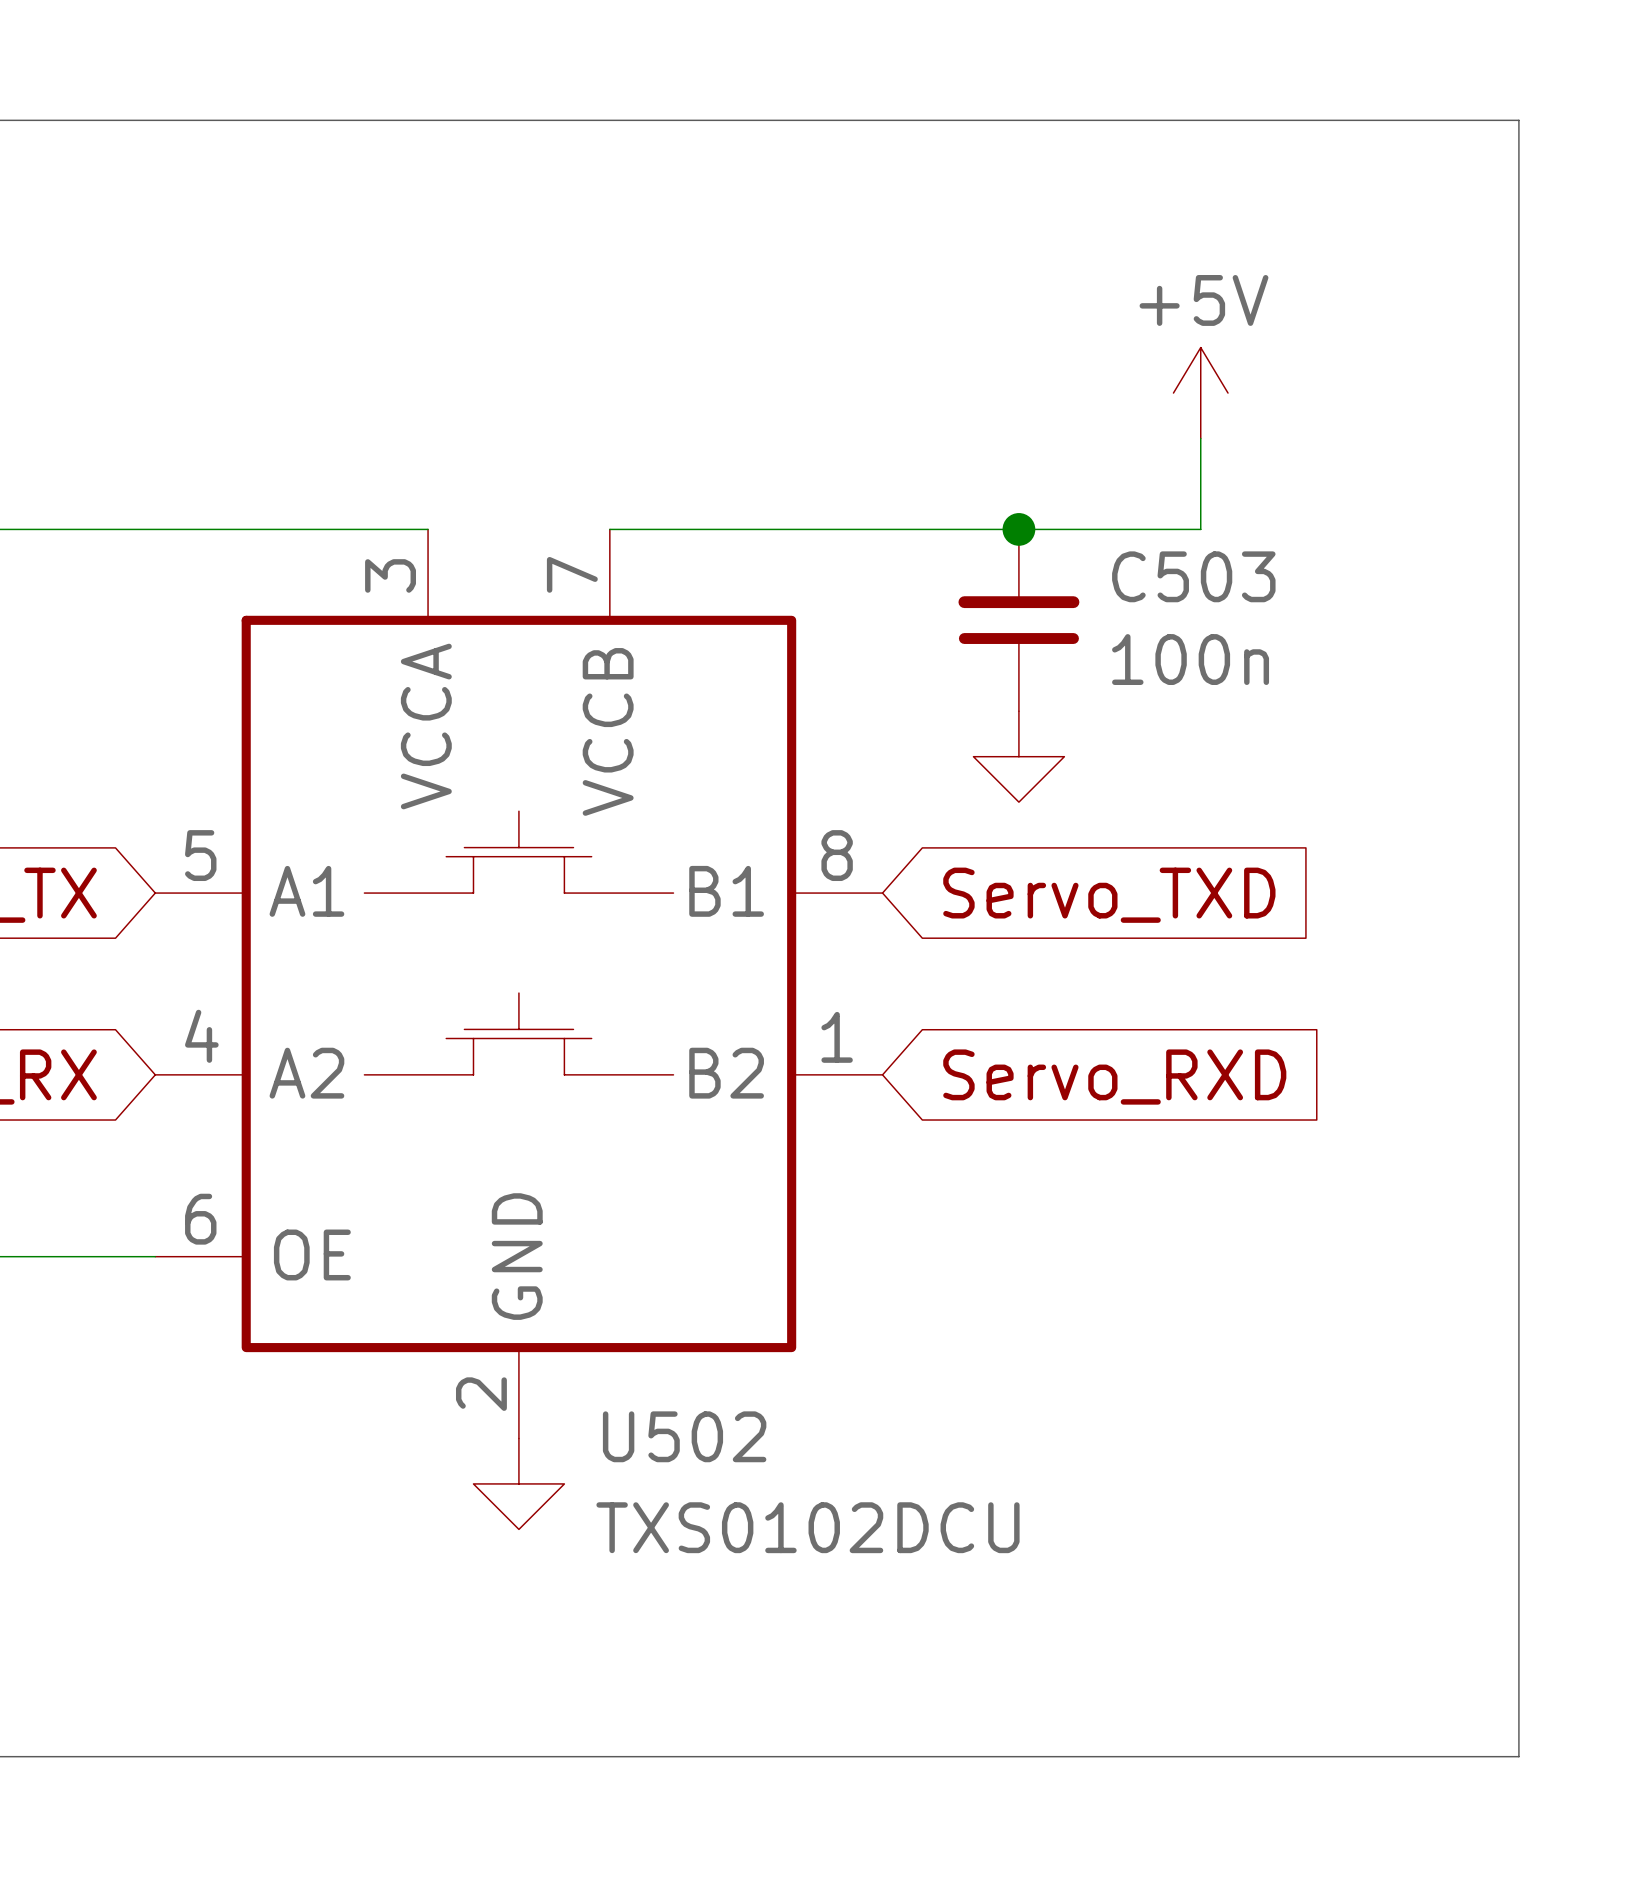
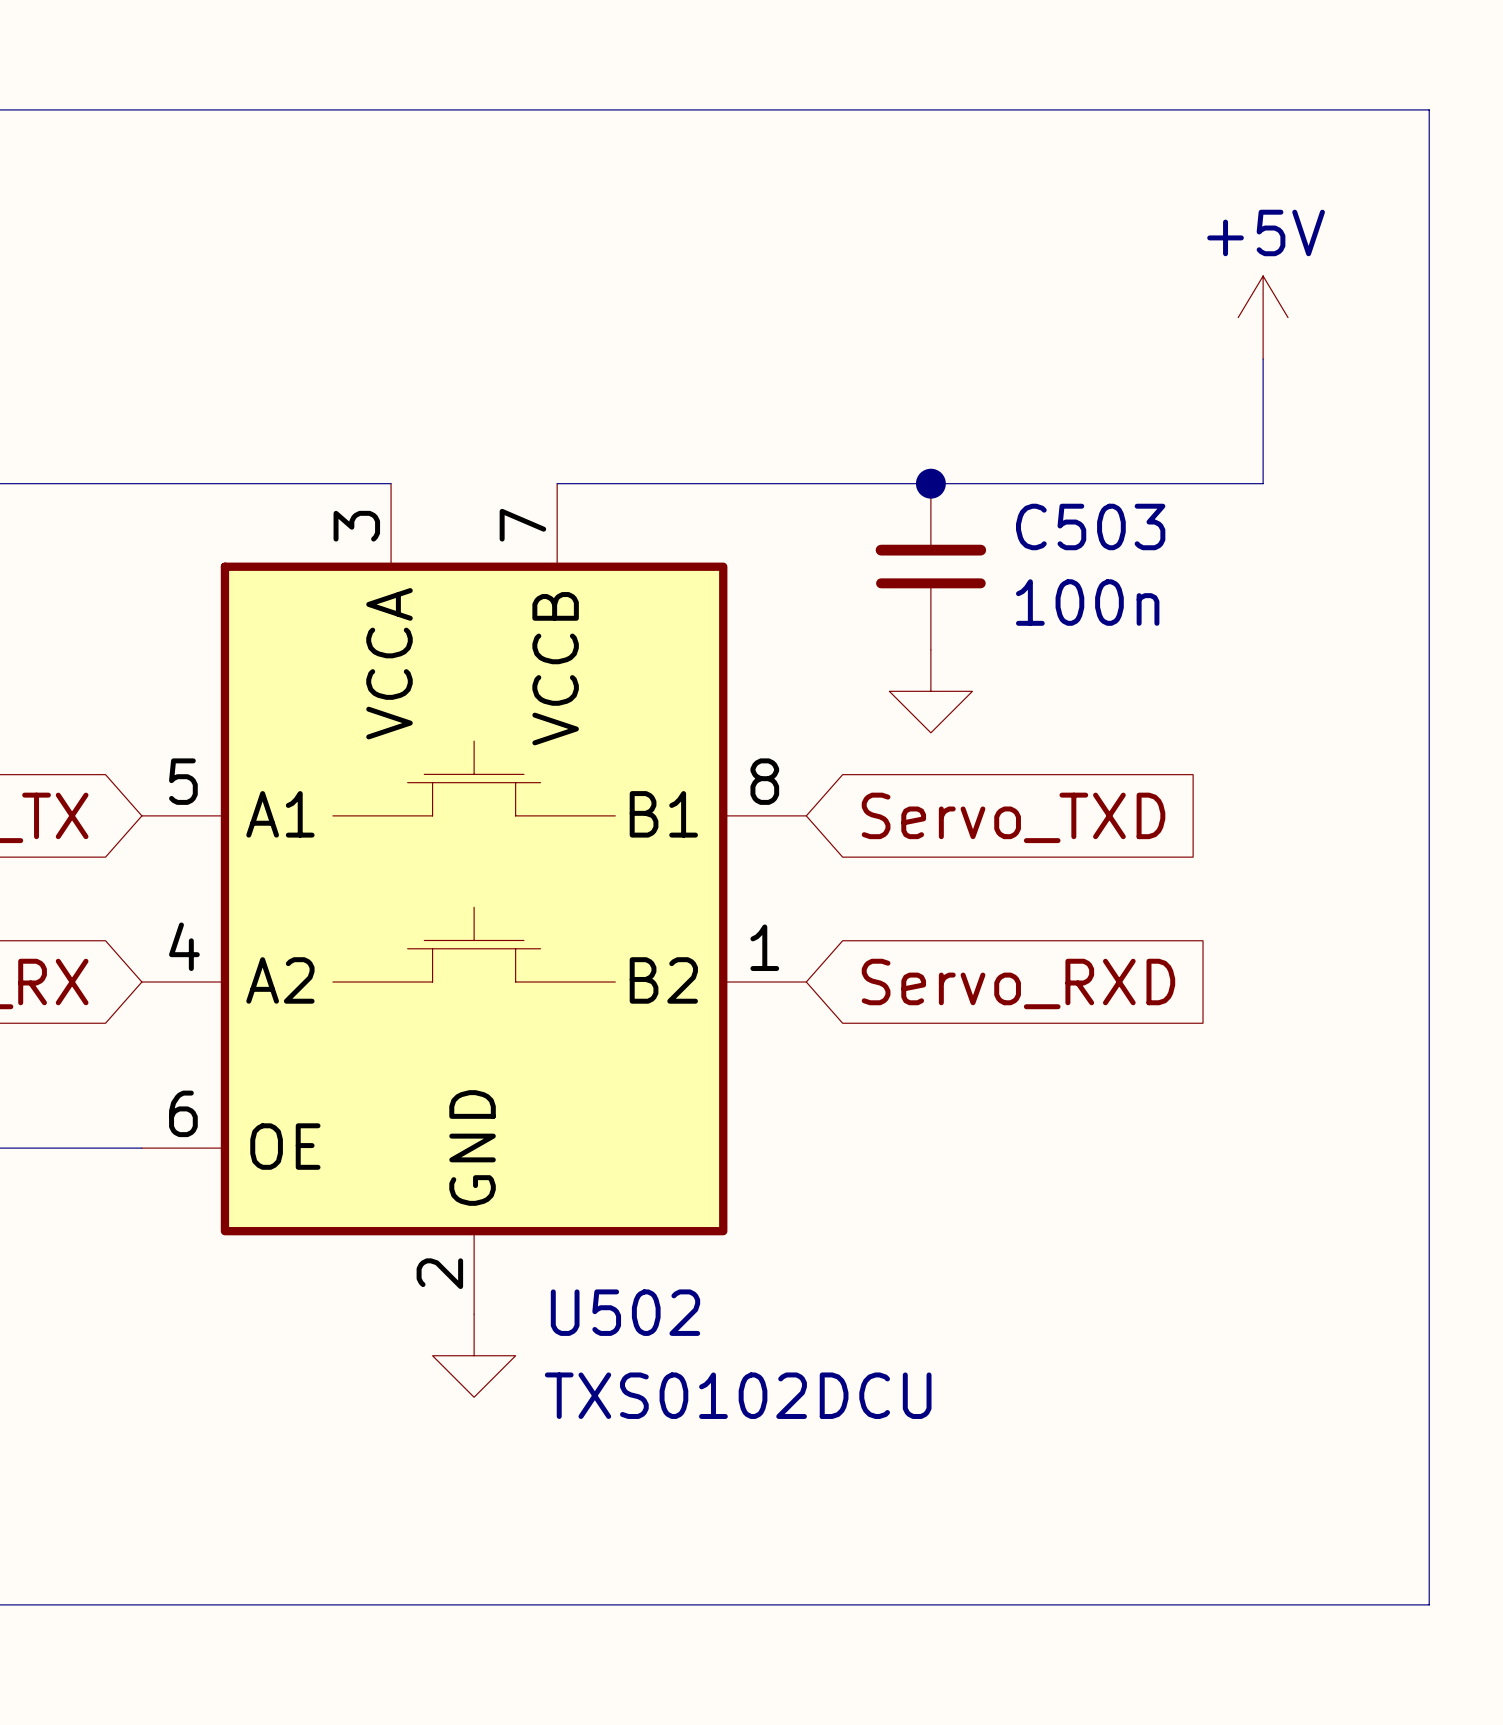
line: (1518, 120) (1518, 1756) -> (1387, 109) (1429, 109) (1429, 1604) (1387, 1604)
power symbol position: +5V (1200, 393) -> +5V (1263, 317)
wire: (1200, 438) (1200, 529) -> (1263, 359) (1263, 483) (1097, 483)

